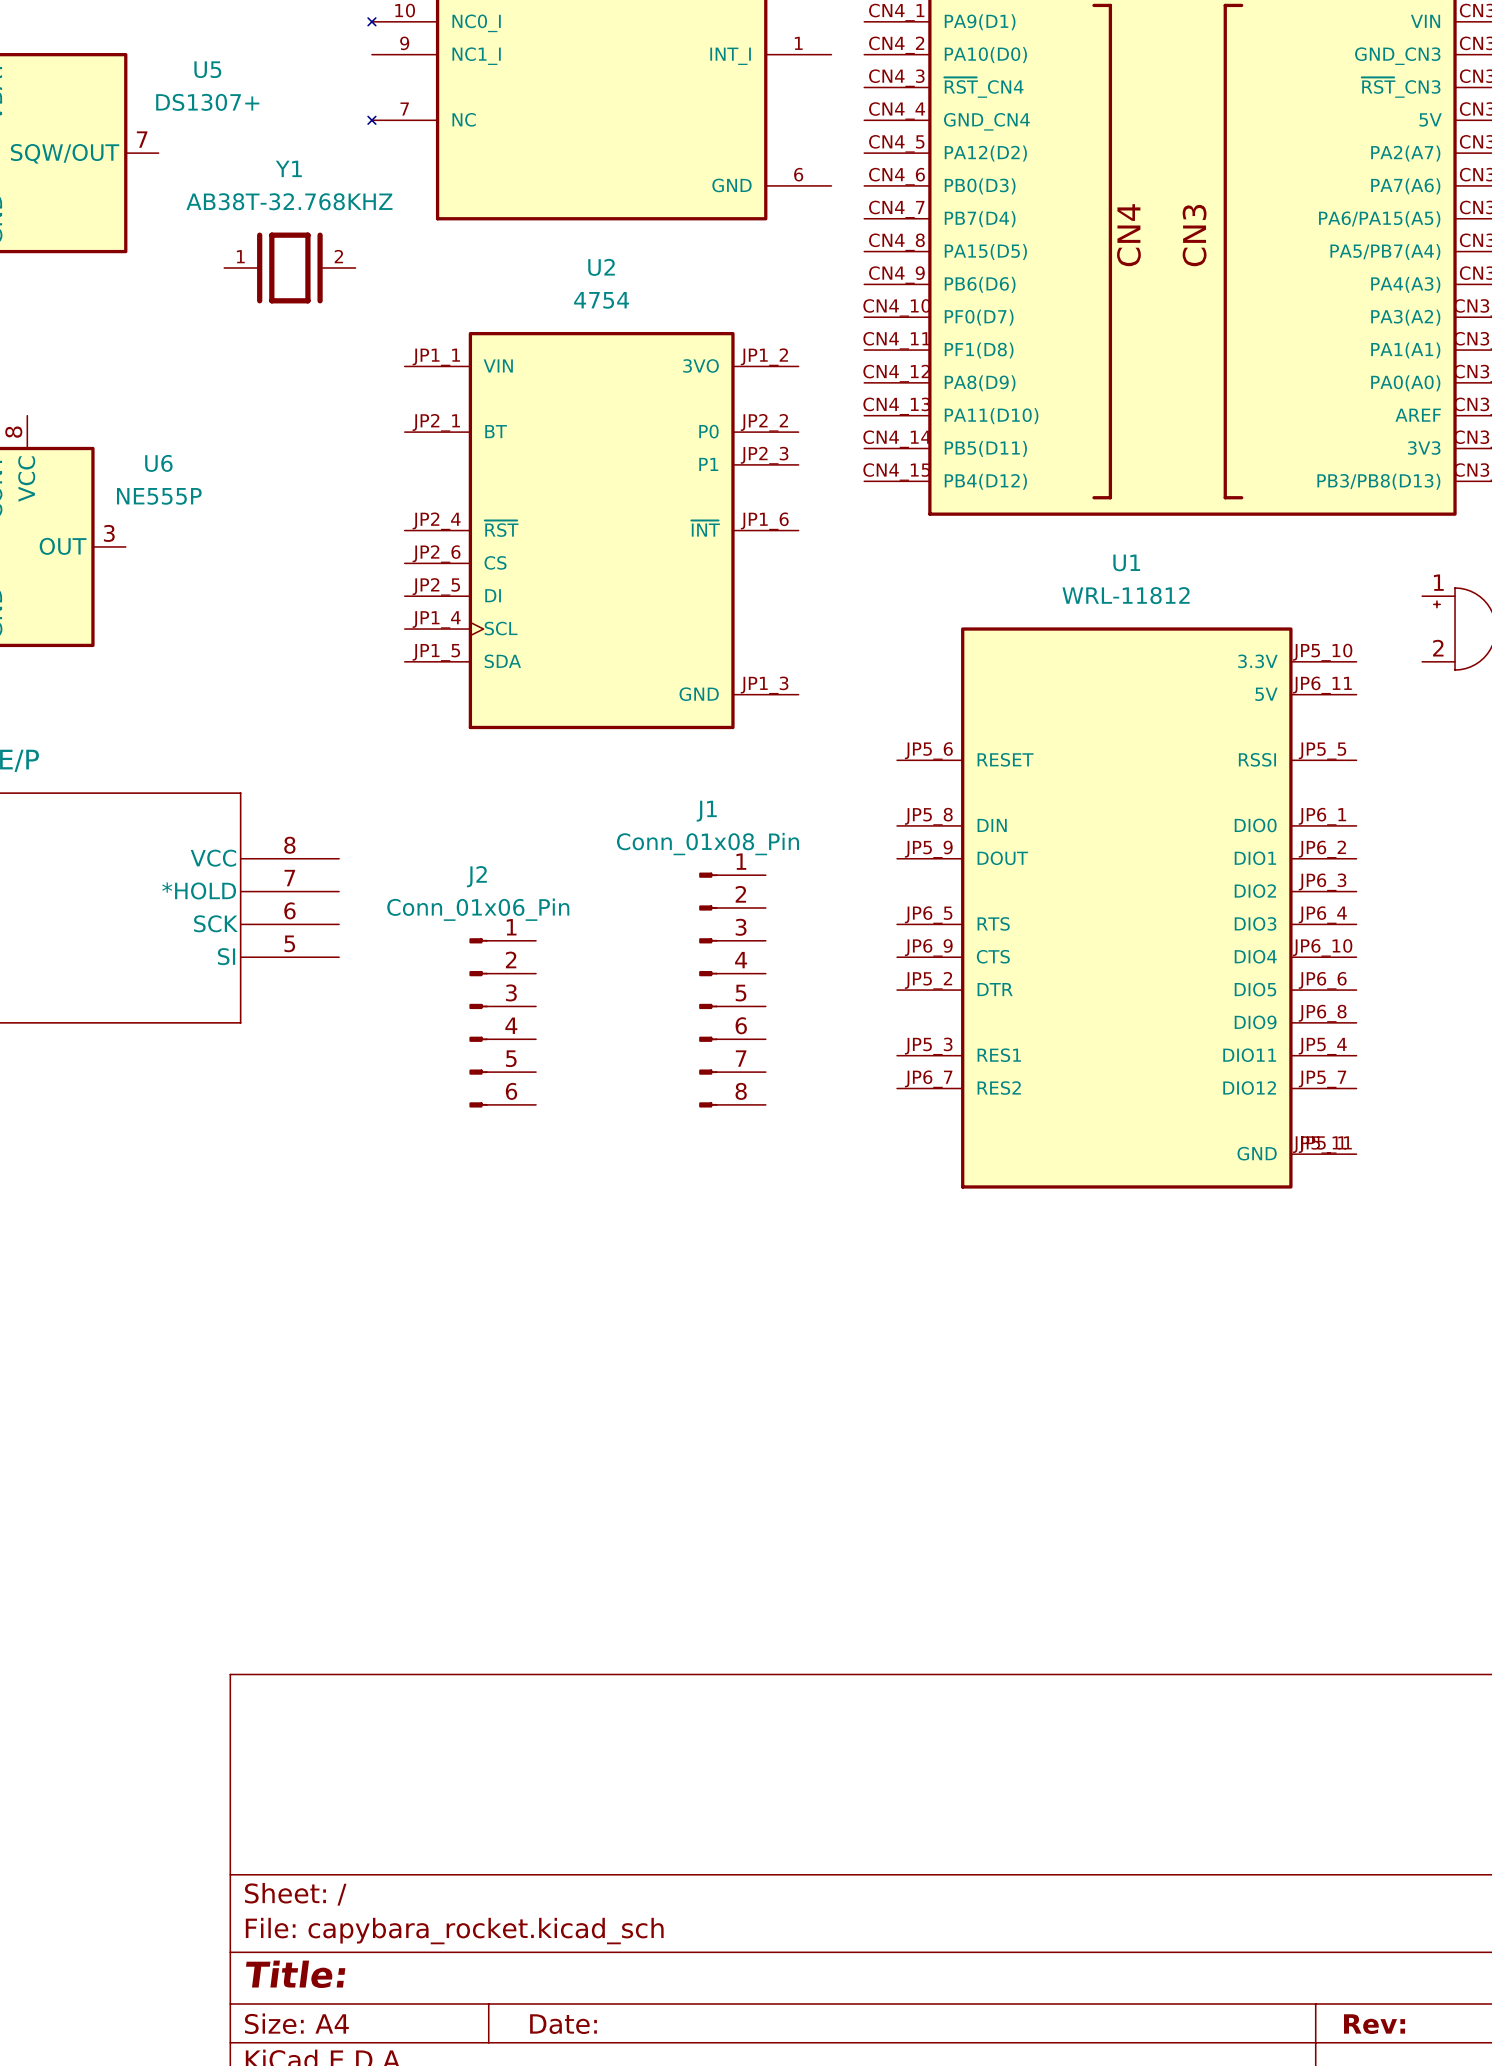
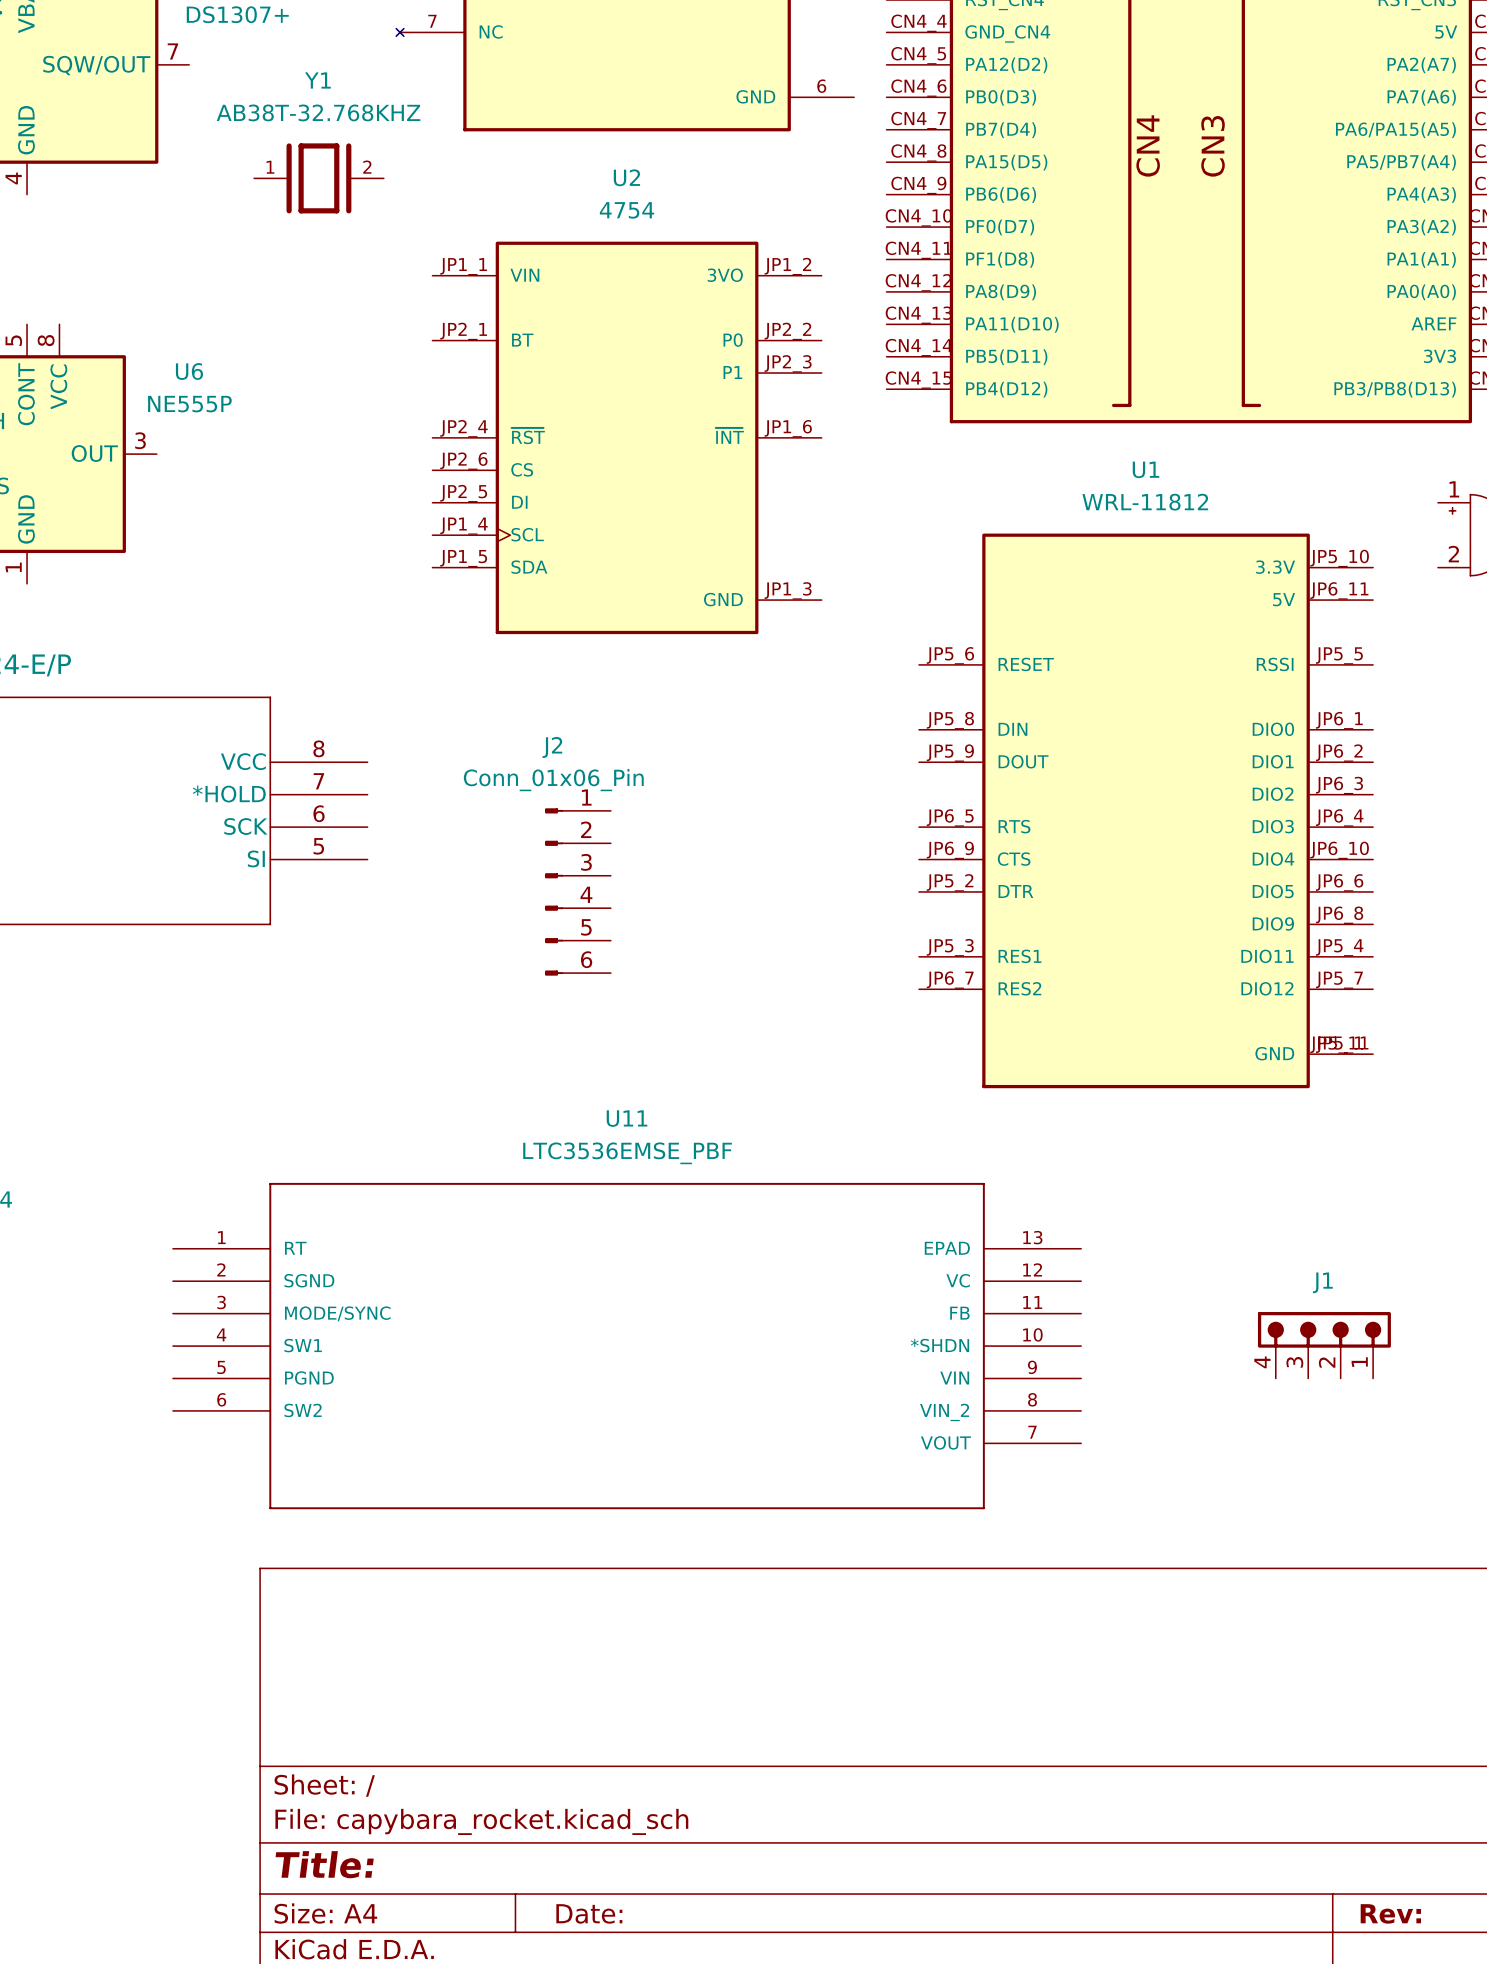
J1 name position: J1 (706, 811) -> J1 (1322, 1282)
J1 value: Conn_01x08_Pin (708, 844) -> none
J1 symbol: [699, 872, 766, 1108] -> [1257, 1312, 1391, 1379]
J2 position: (502, 1022) -> (577, 891)
U11: none -> LTC3536EMSE_PBF (627, 1346)

